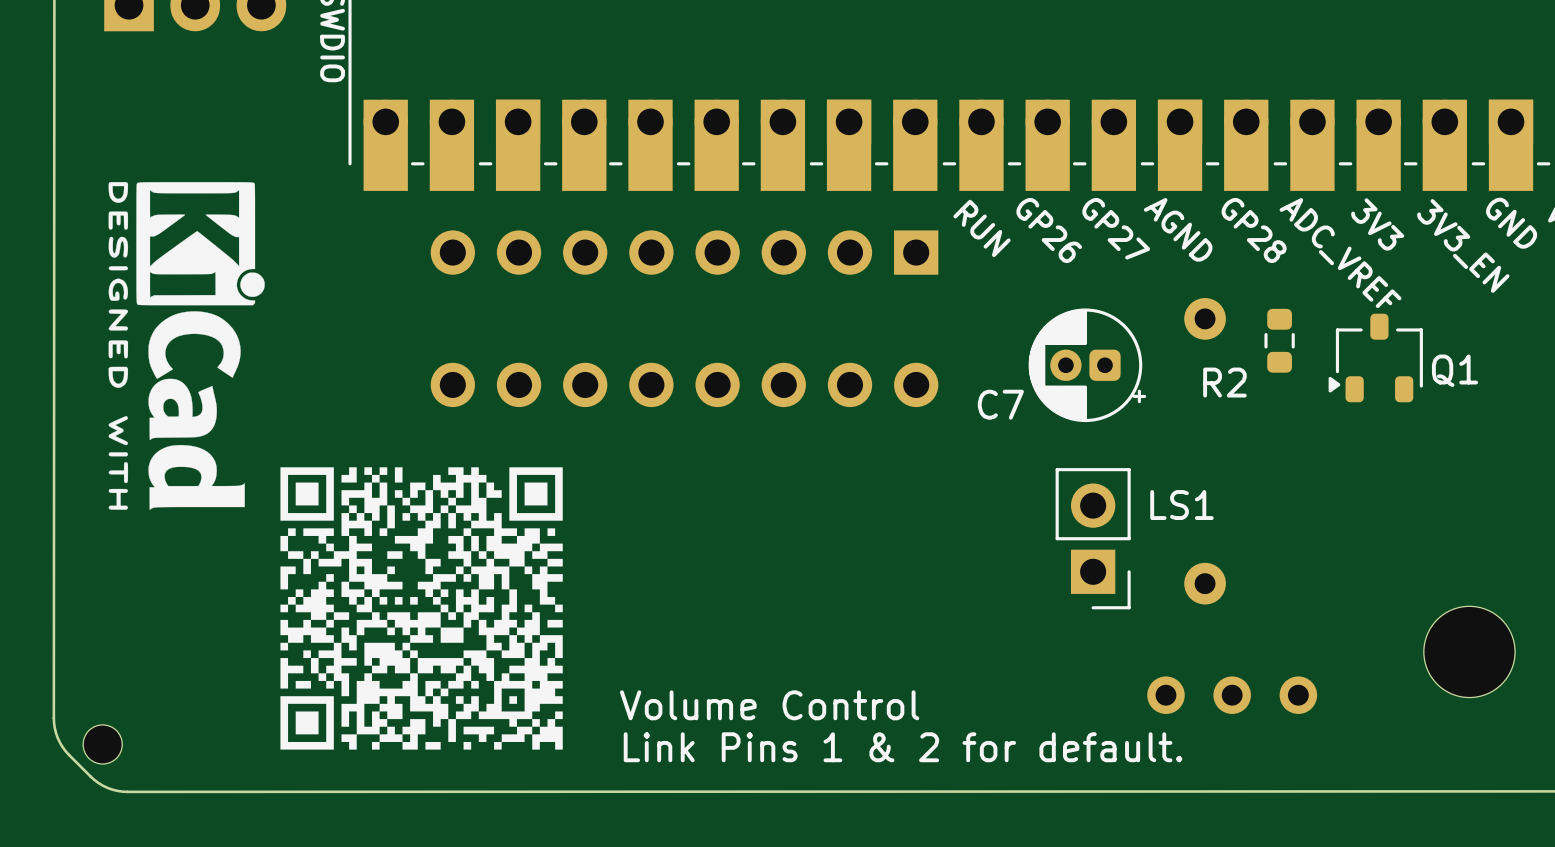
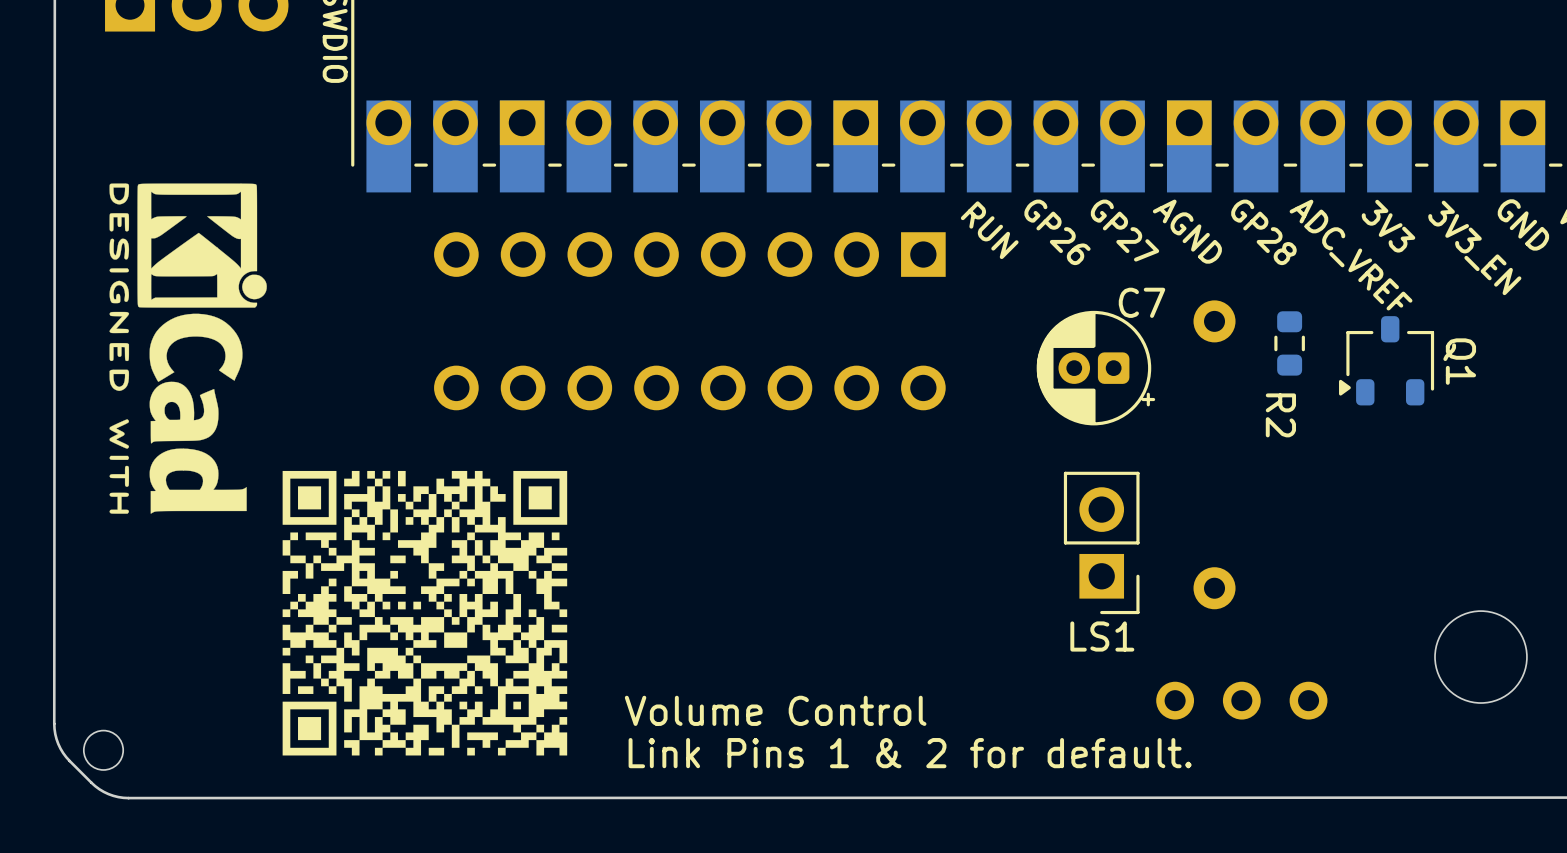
Q1 name rotation: 0° (1454, 370) -> 90° clockwise (1459, 361)
R2 name rotation: 0° (1224, 382) -> 90° clockwise (1280, 415)
C7 name position: C7 (1000, 404) -> C7 (1141, 302)
LS1 name position: LS1 (1181, 505) -> LS1 (1102, 636)

